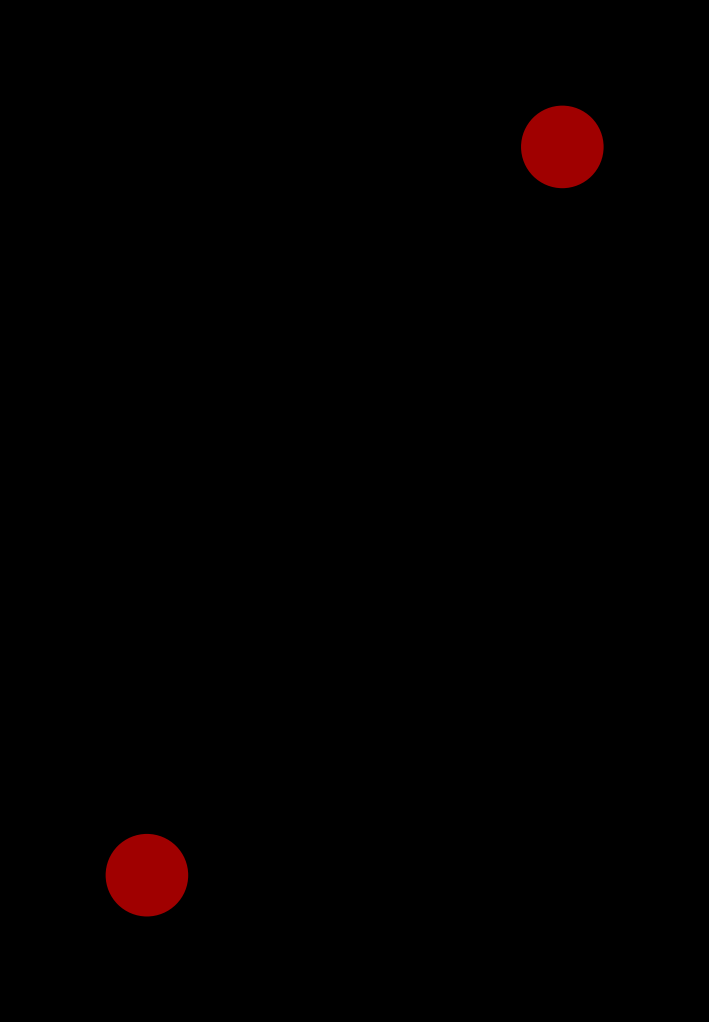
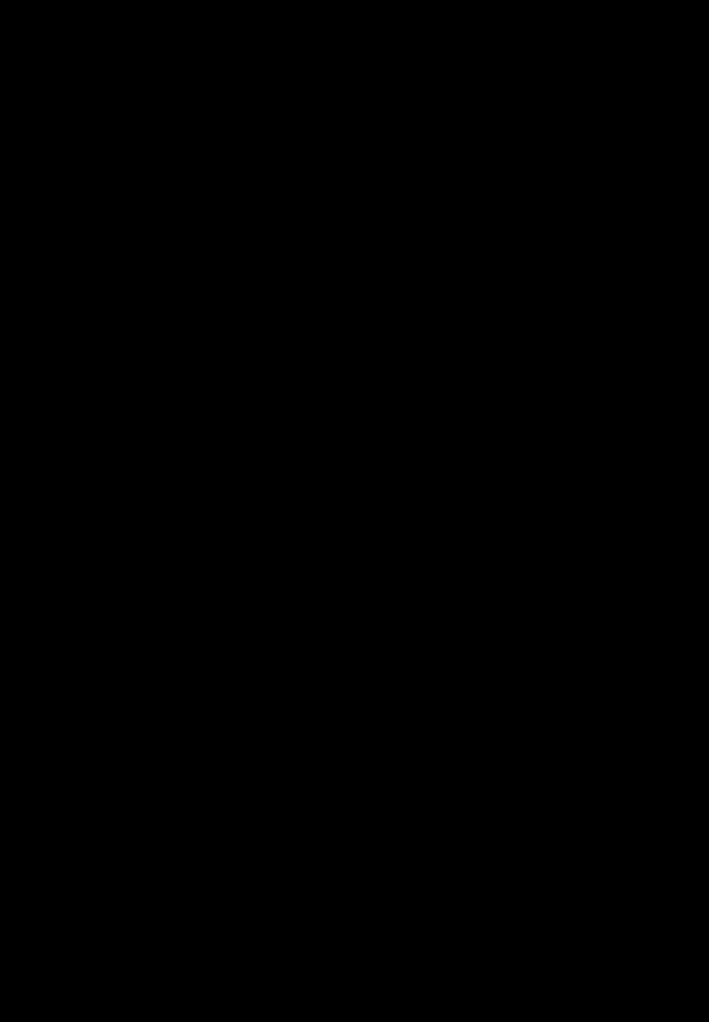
part: (562, 146) -> none
part: (146, 875) -> none

